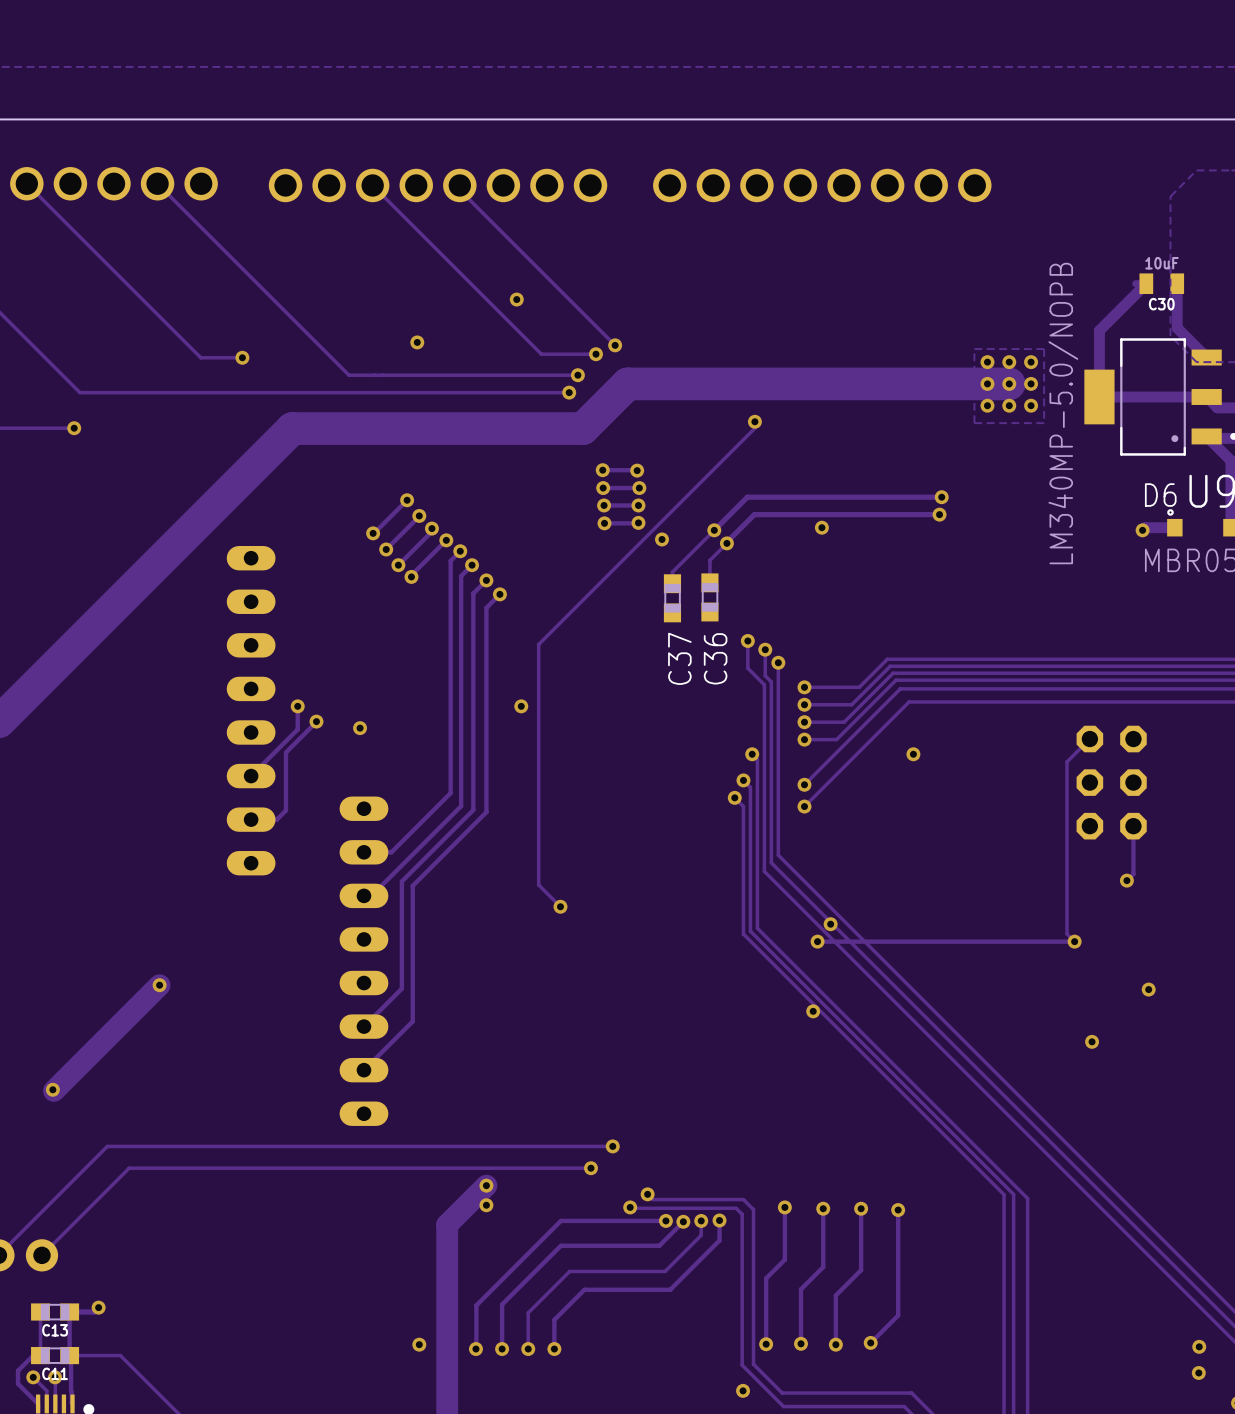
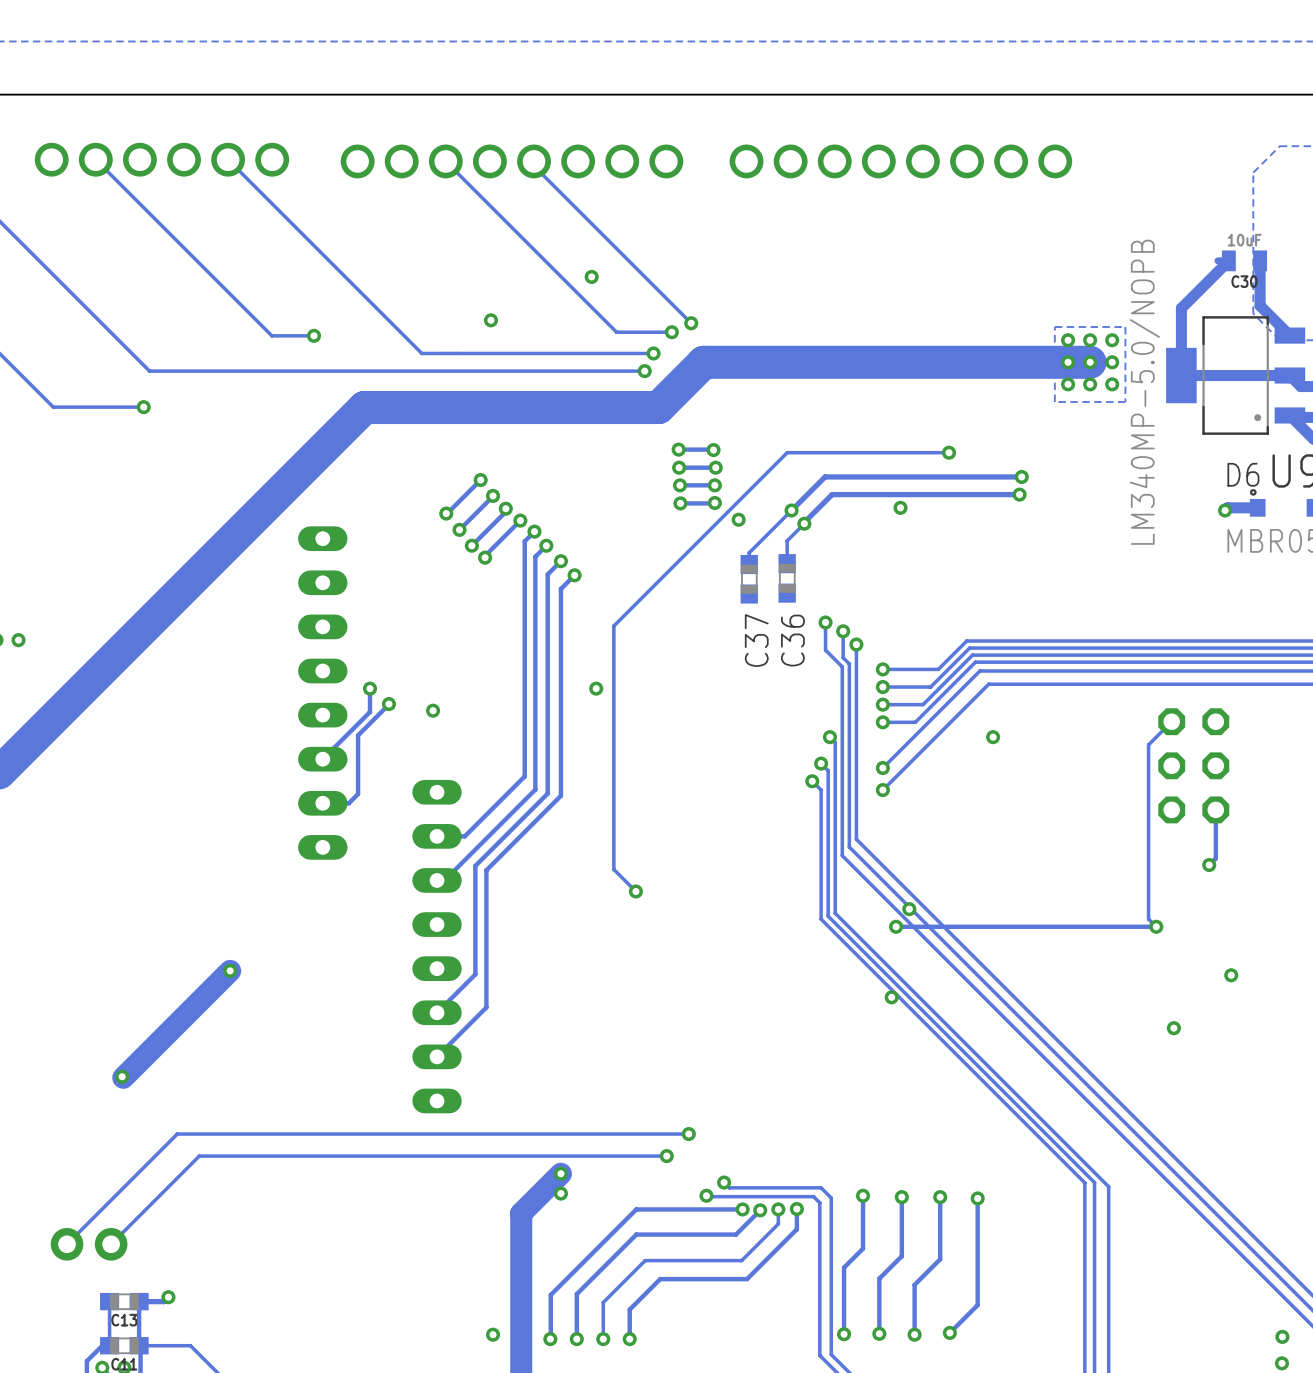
track: (754, 421) (754, 428) (709, 473) -> (949, 452) (787, 452)
via: (754, 421) -> none
via: none -> (949, 452)

